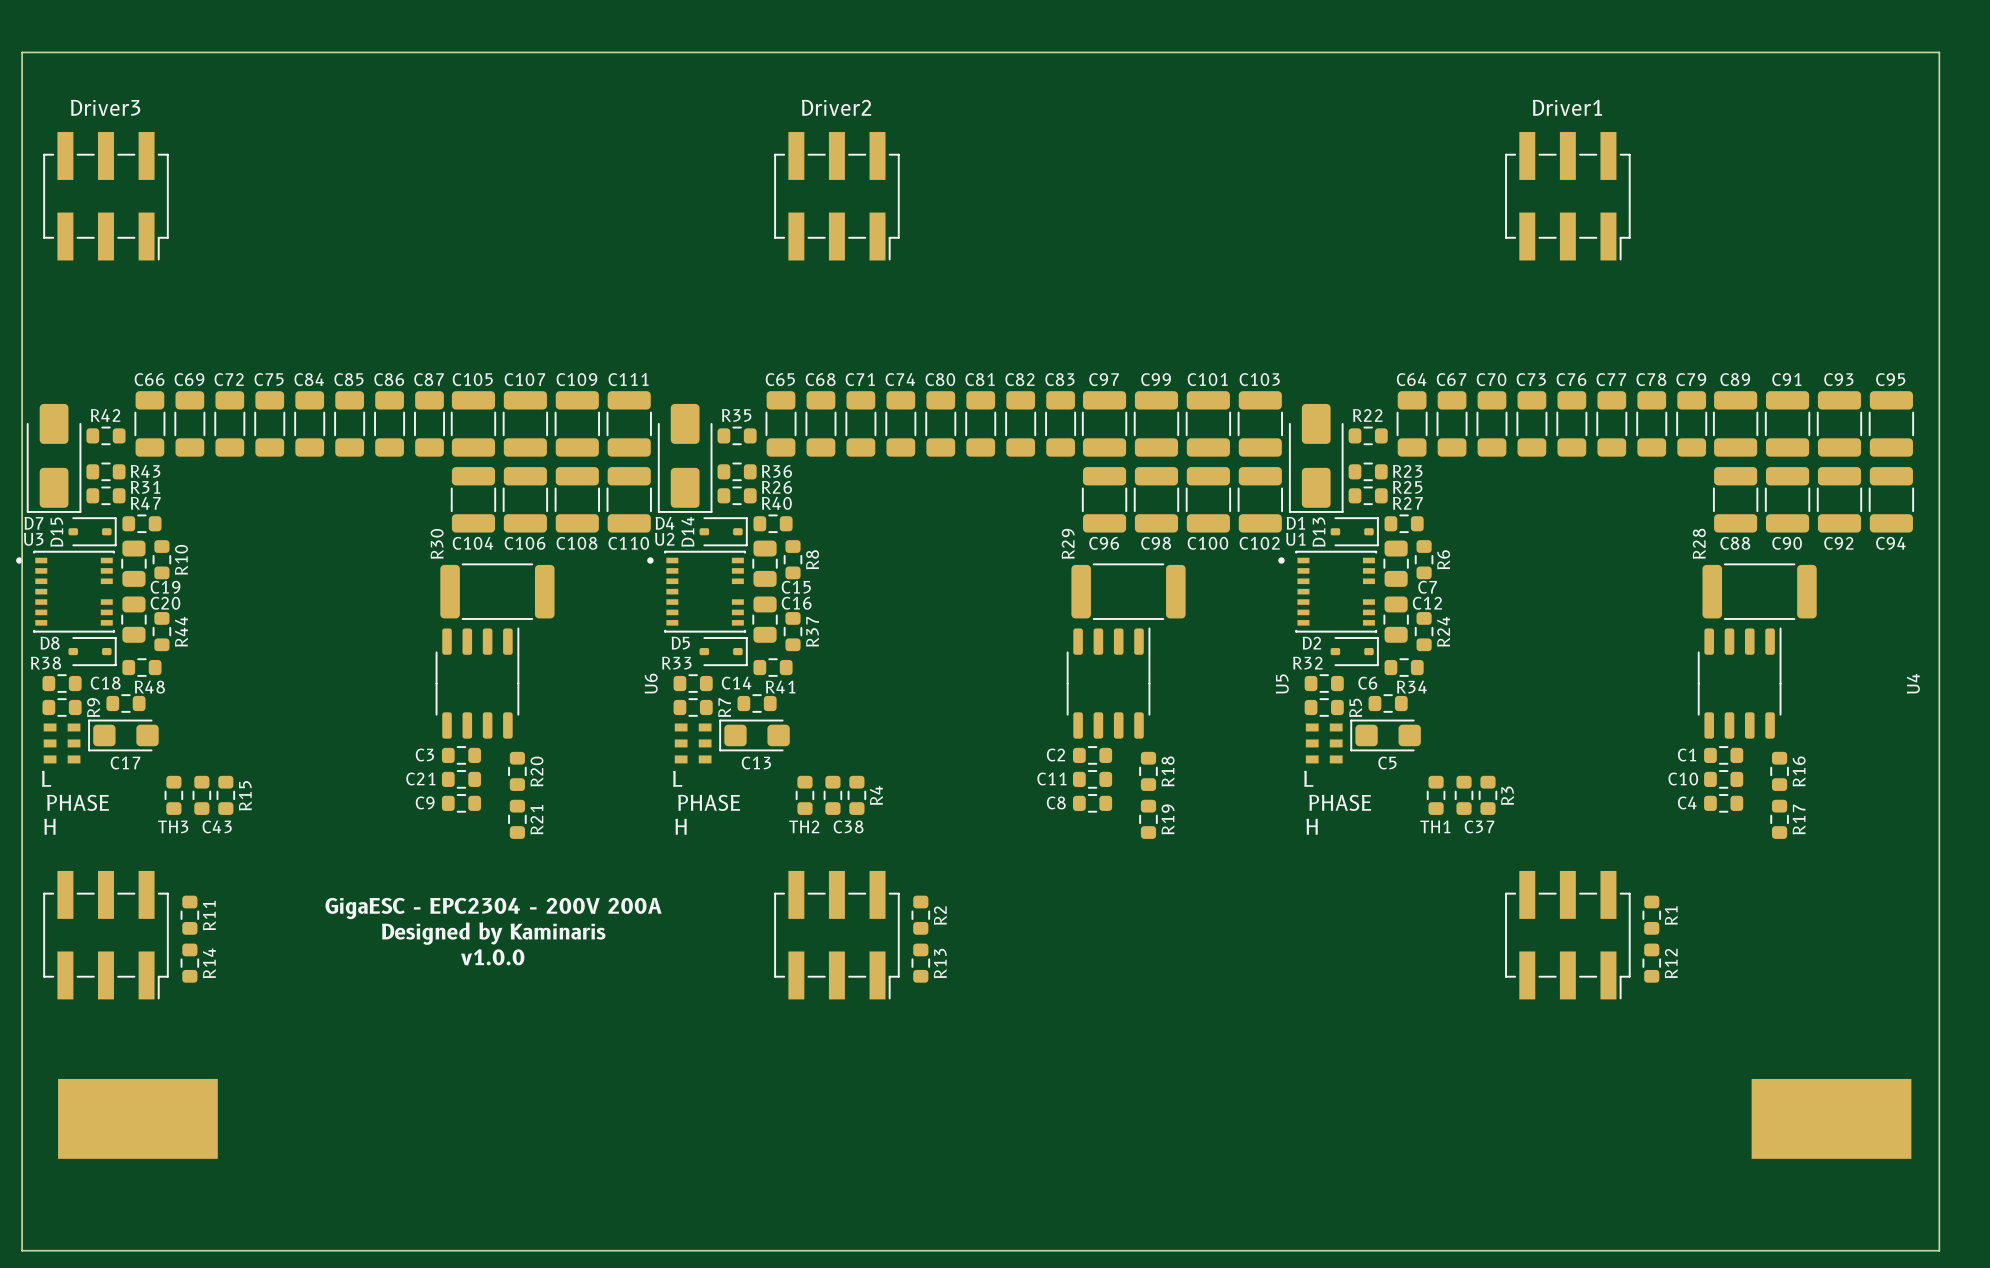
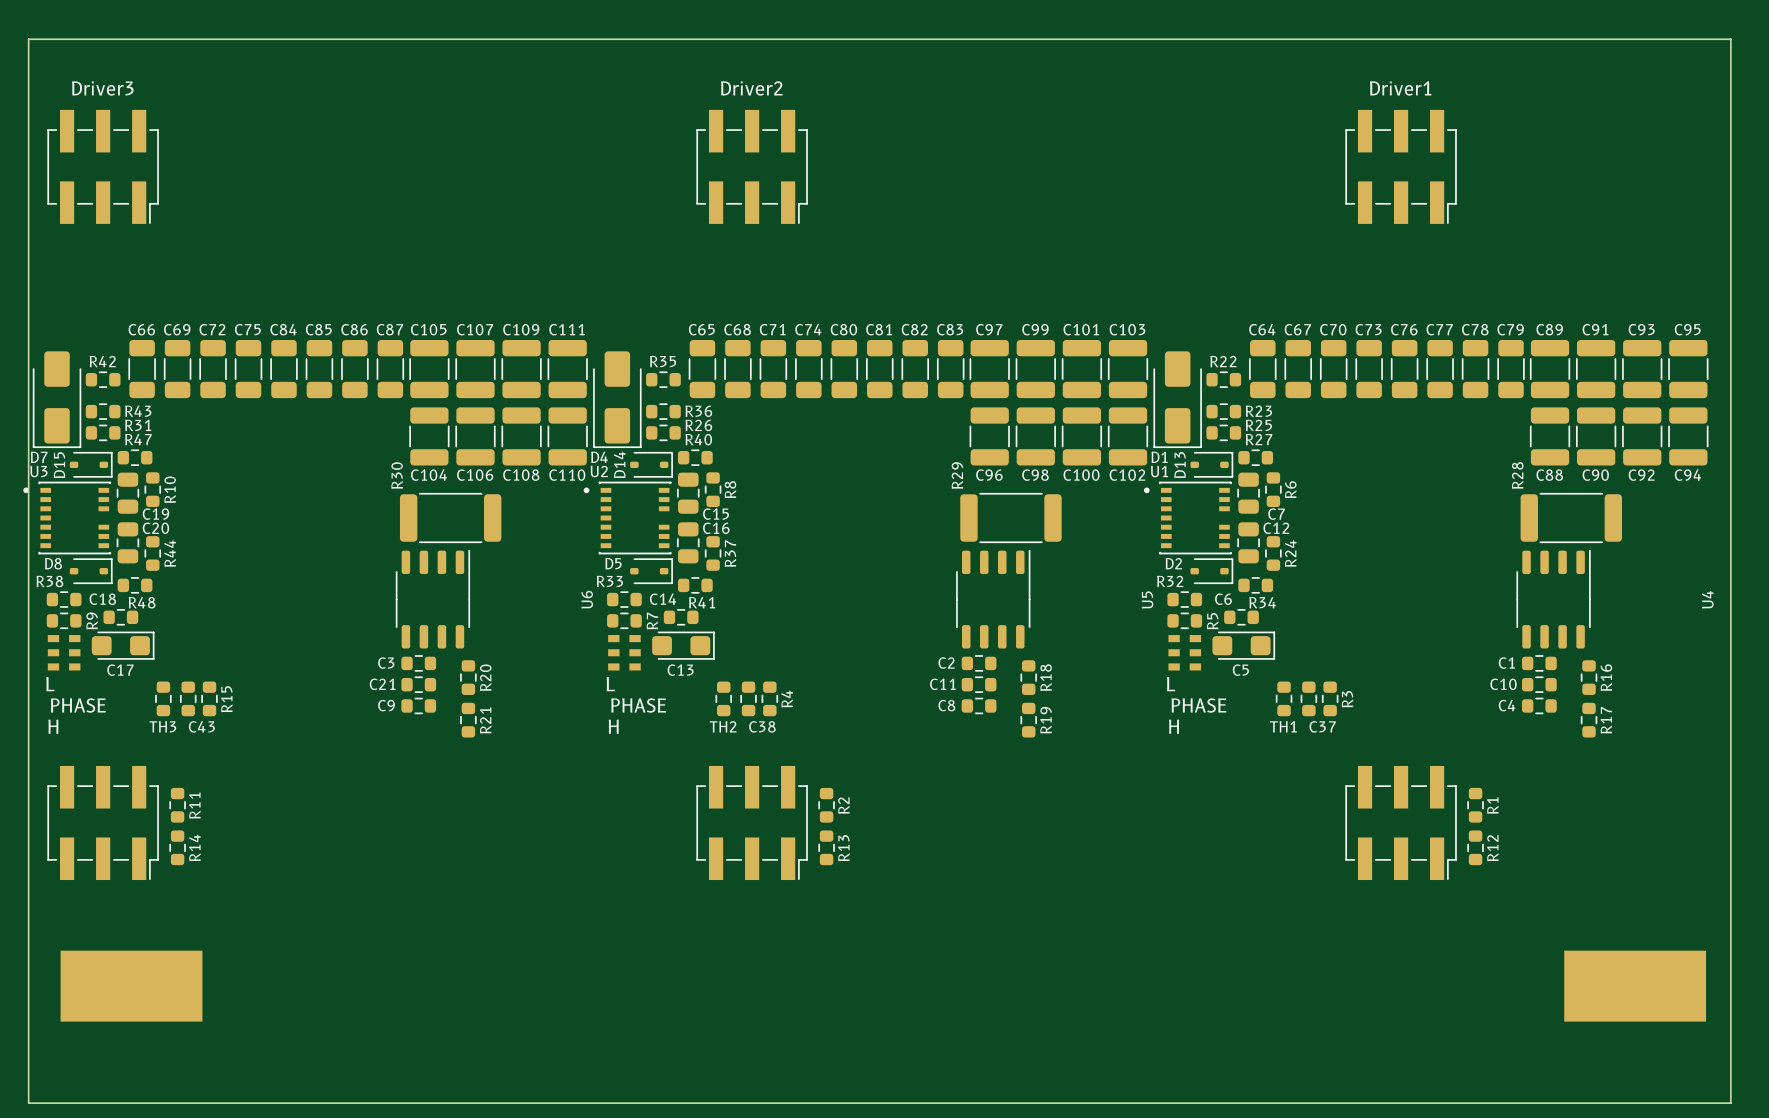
C17 rotation: 0° (123, 735) -> 180° (123, 645)
C13 rotation: 0° (754, 735) -> 180° (683, 645)
C5 rotation: 0° (1385, 735) -> 180° (1243, 645)
text: GigaESC - EPC2304 - 200V 200A (493, 908) -> none
text: Designed by Kaminaris (493, 933) -> none
text: v1.0.0 (492, 957) -> none

